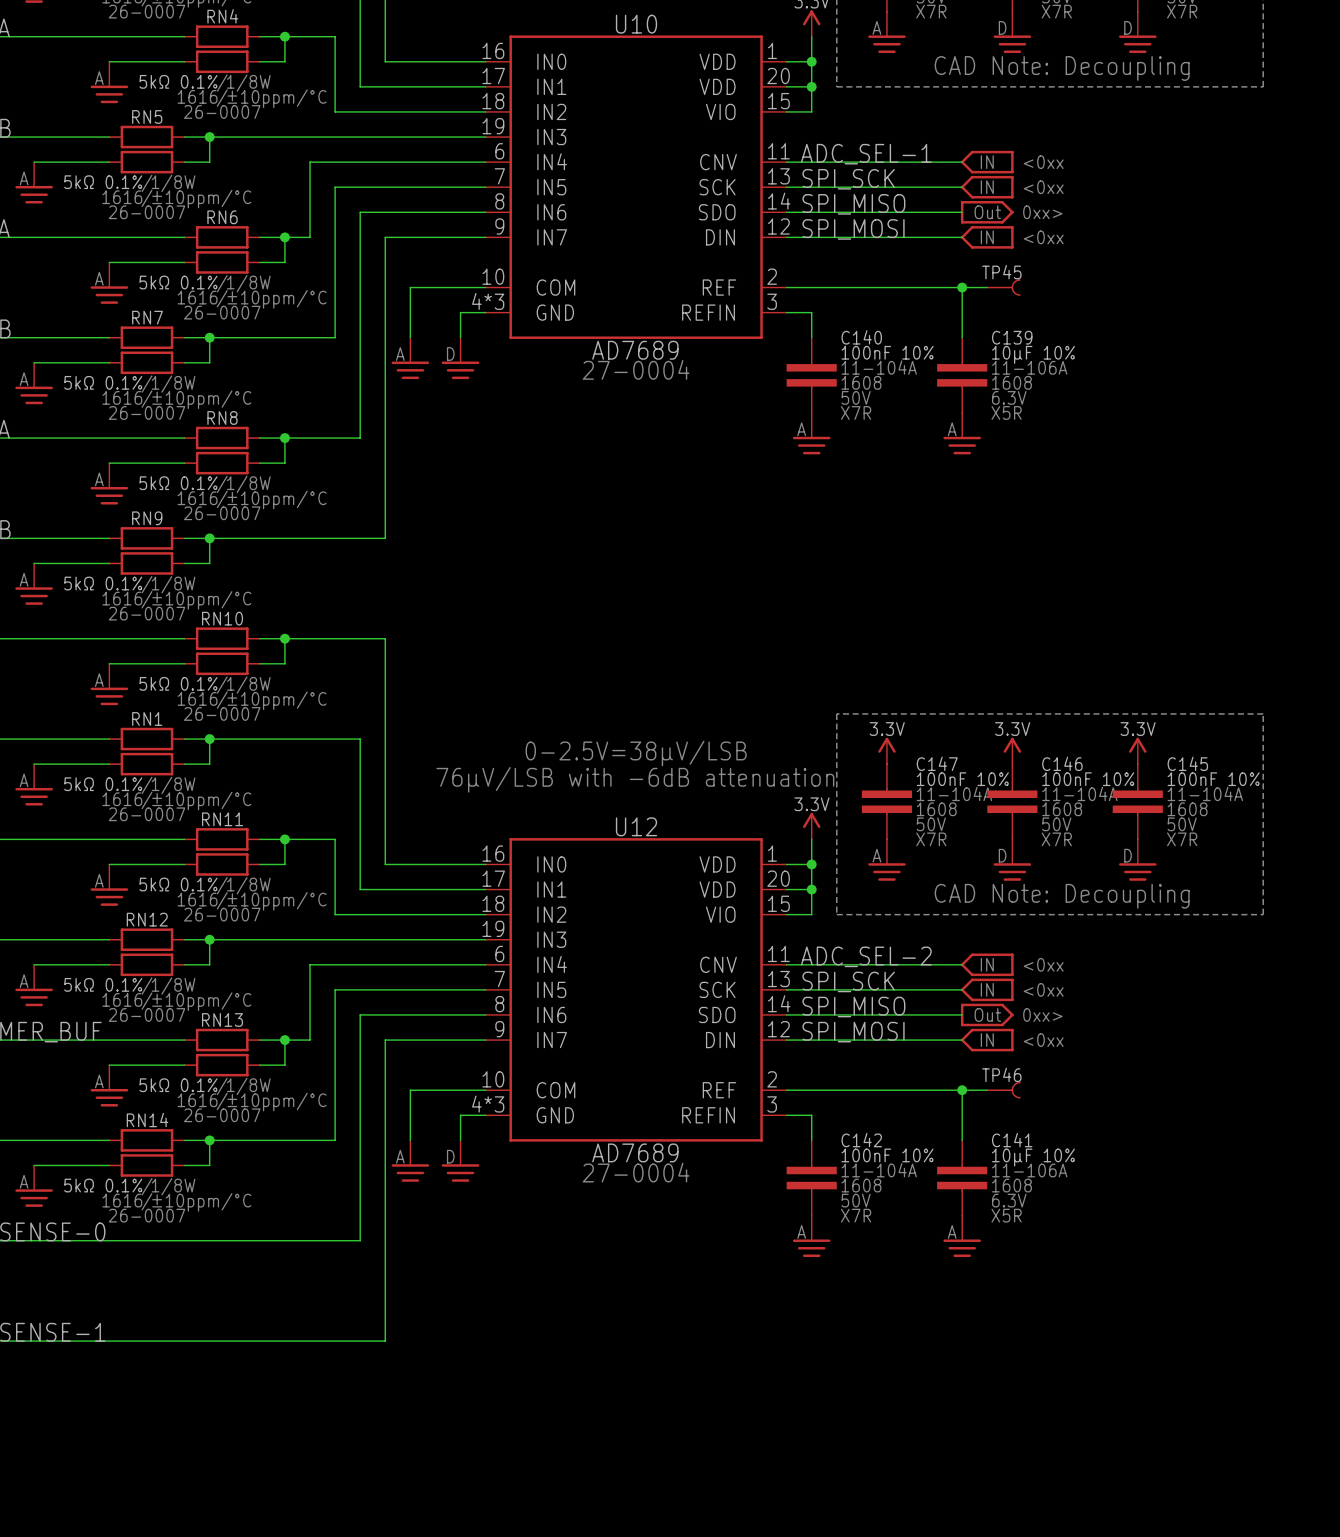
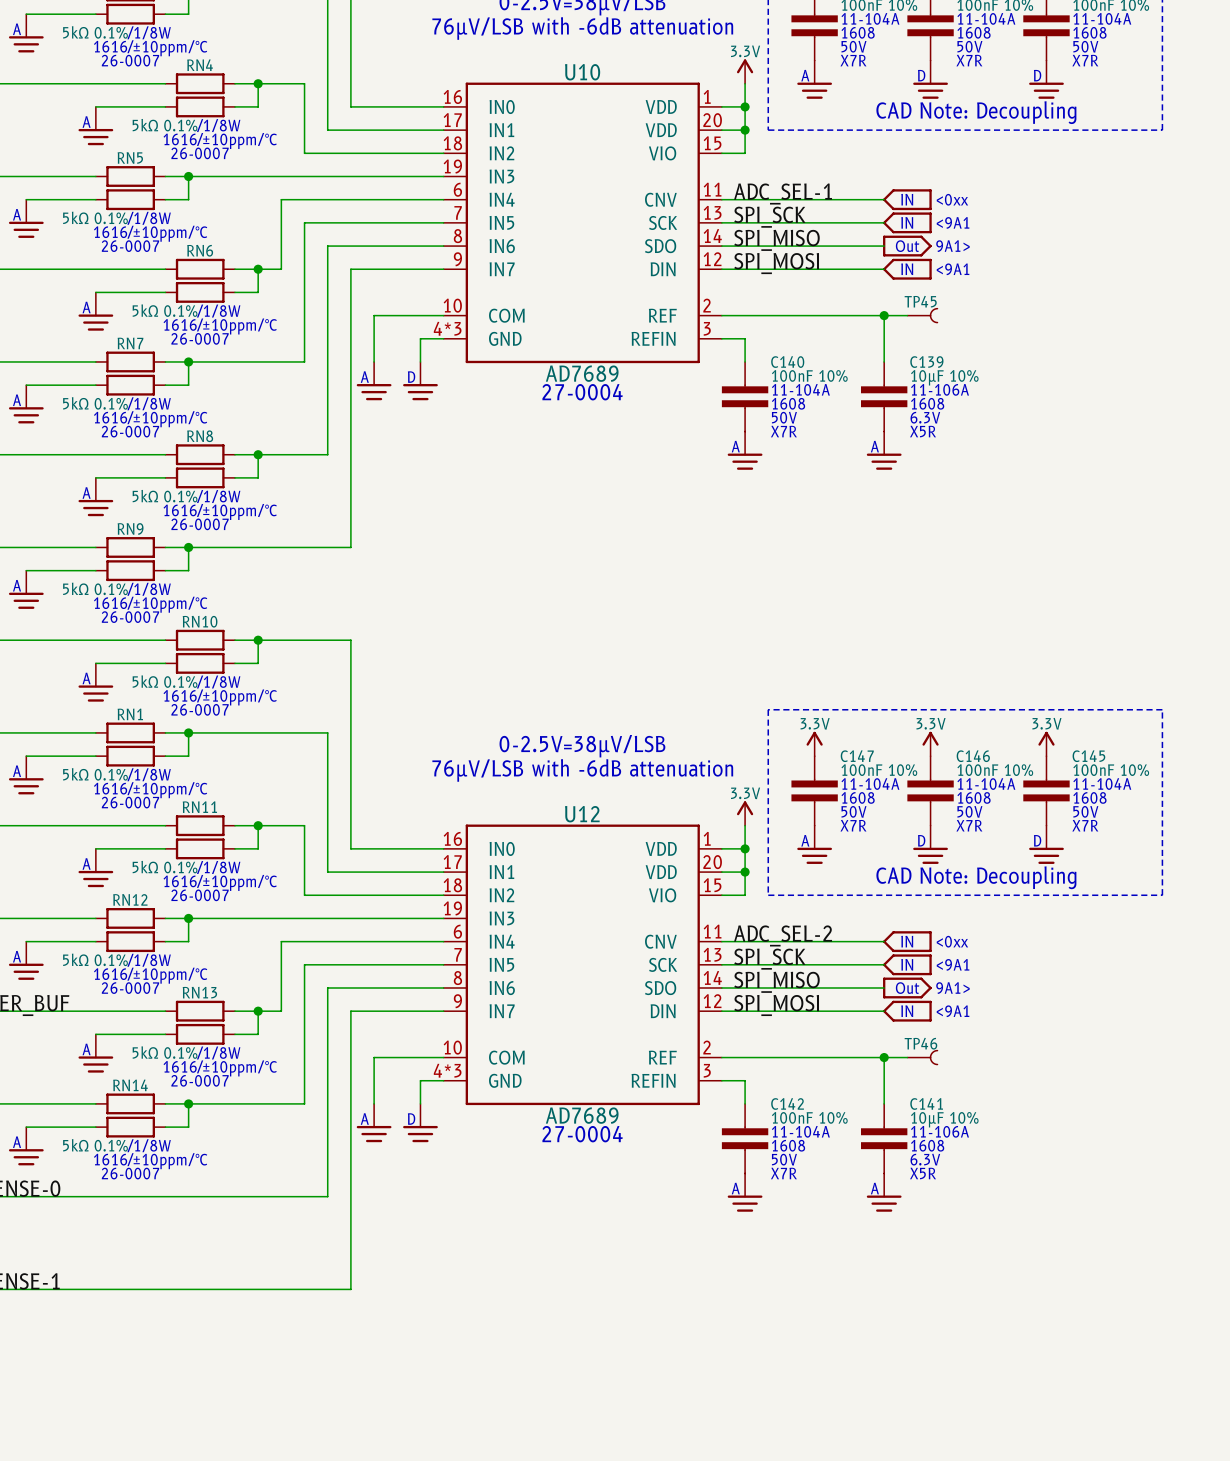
text: <0xx (1043, 187) -> <9A1 (953, 222)
text: 0xx> (1042, 212) -> 9A1> (952, 246)
text: <0xx (1043, 237) -> <9A1 (953, 269)
text: <0xx (1043, 989) -> <9A1 (953, 964)
text: 0xx> (1042, 1014) -> 9A1> (952, 988)
text: <0xx (1043, 1040) -> <9A1 (953, 1011)

